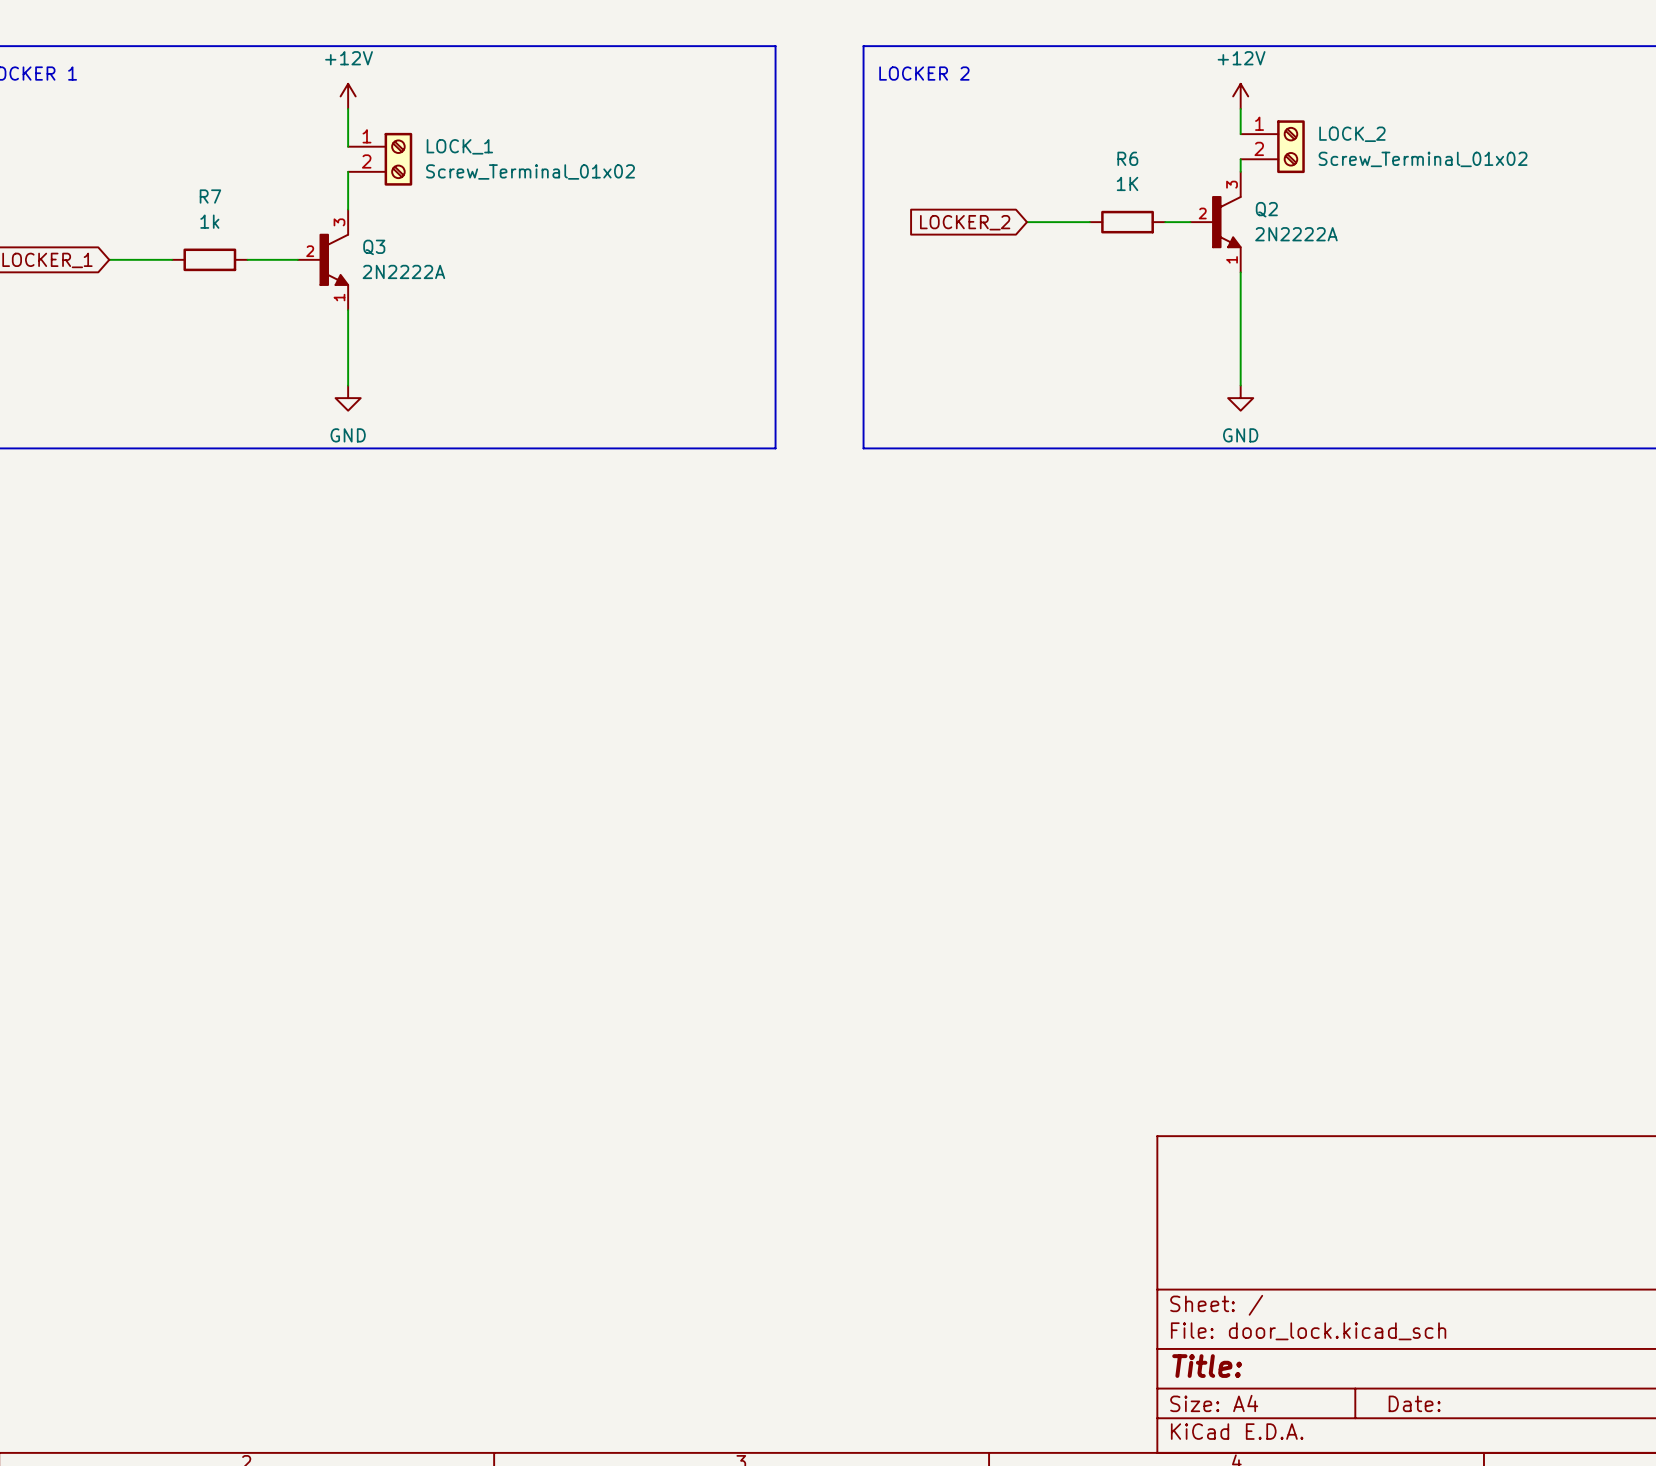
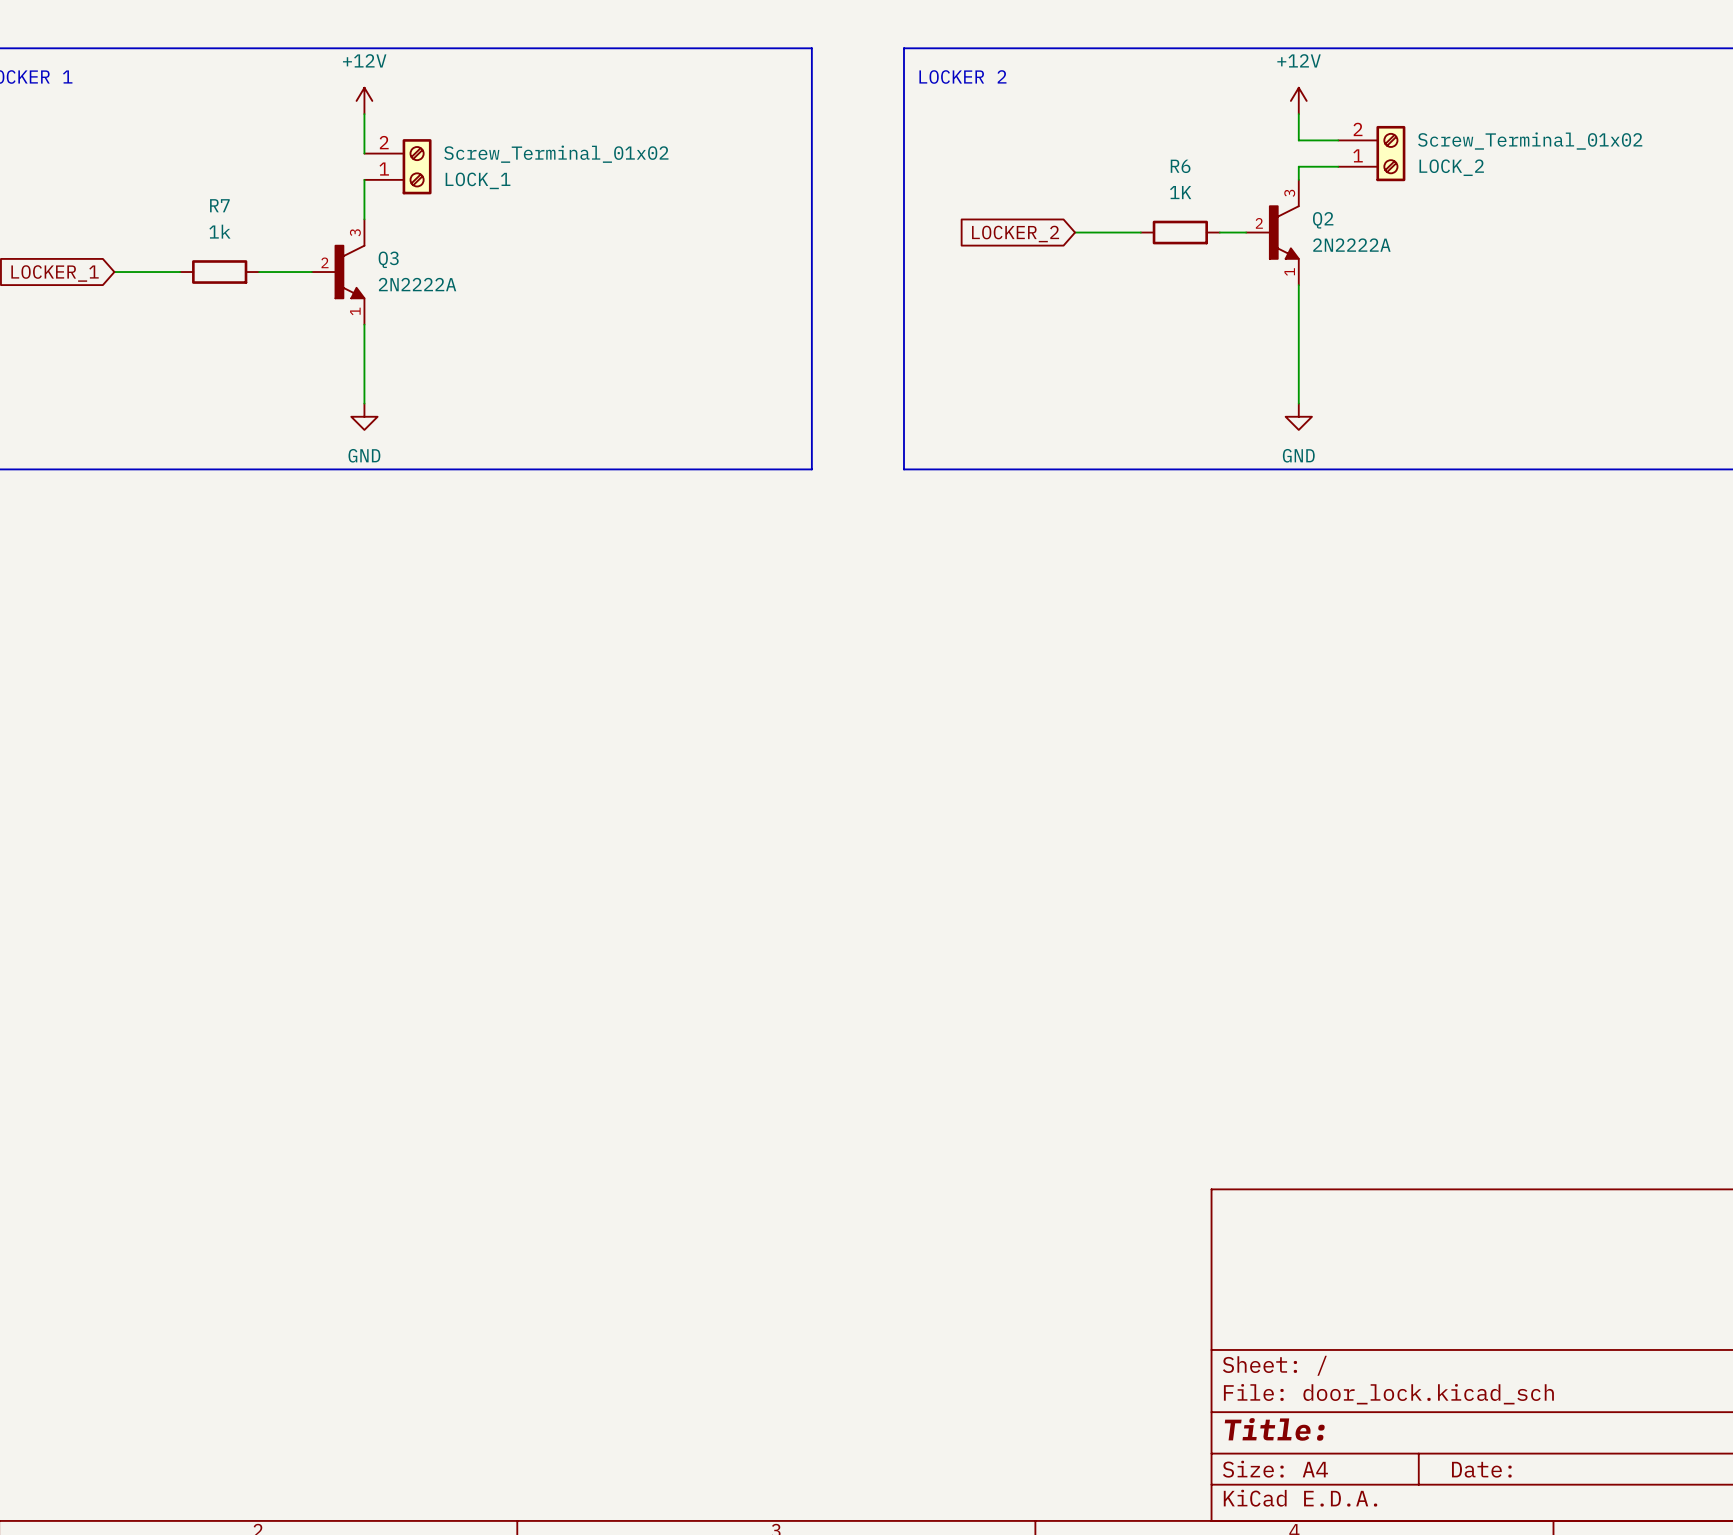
LOCK_2 flip: as is (1290, 146) -> up-down (1390, 153)
LOCK_1 flip: as is (398, 159) -> up-down (417, 166)

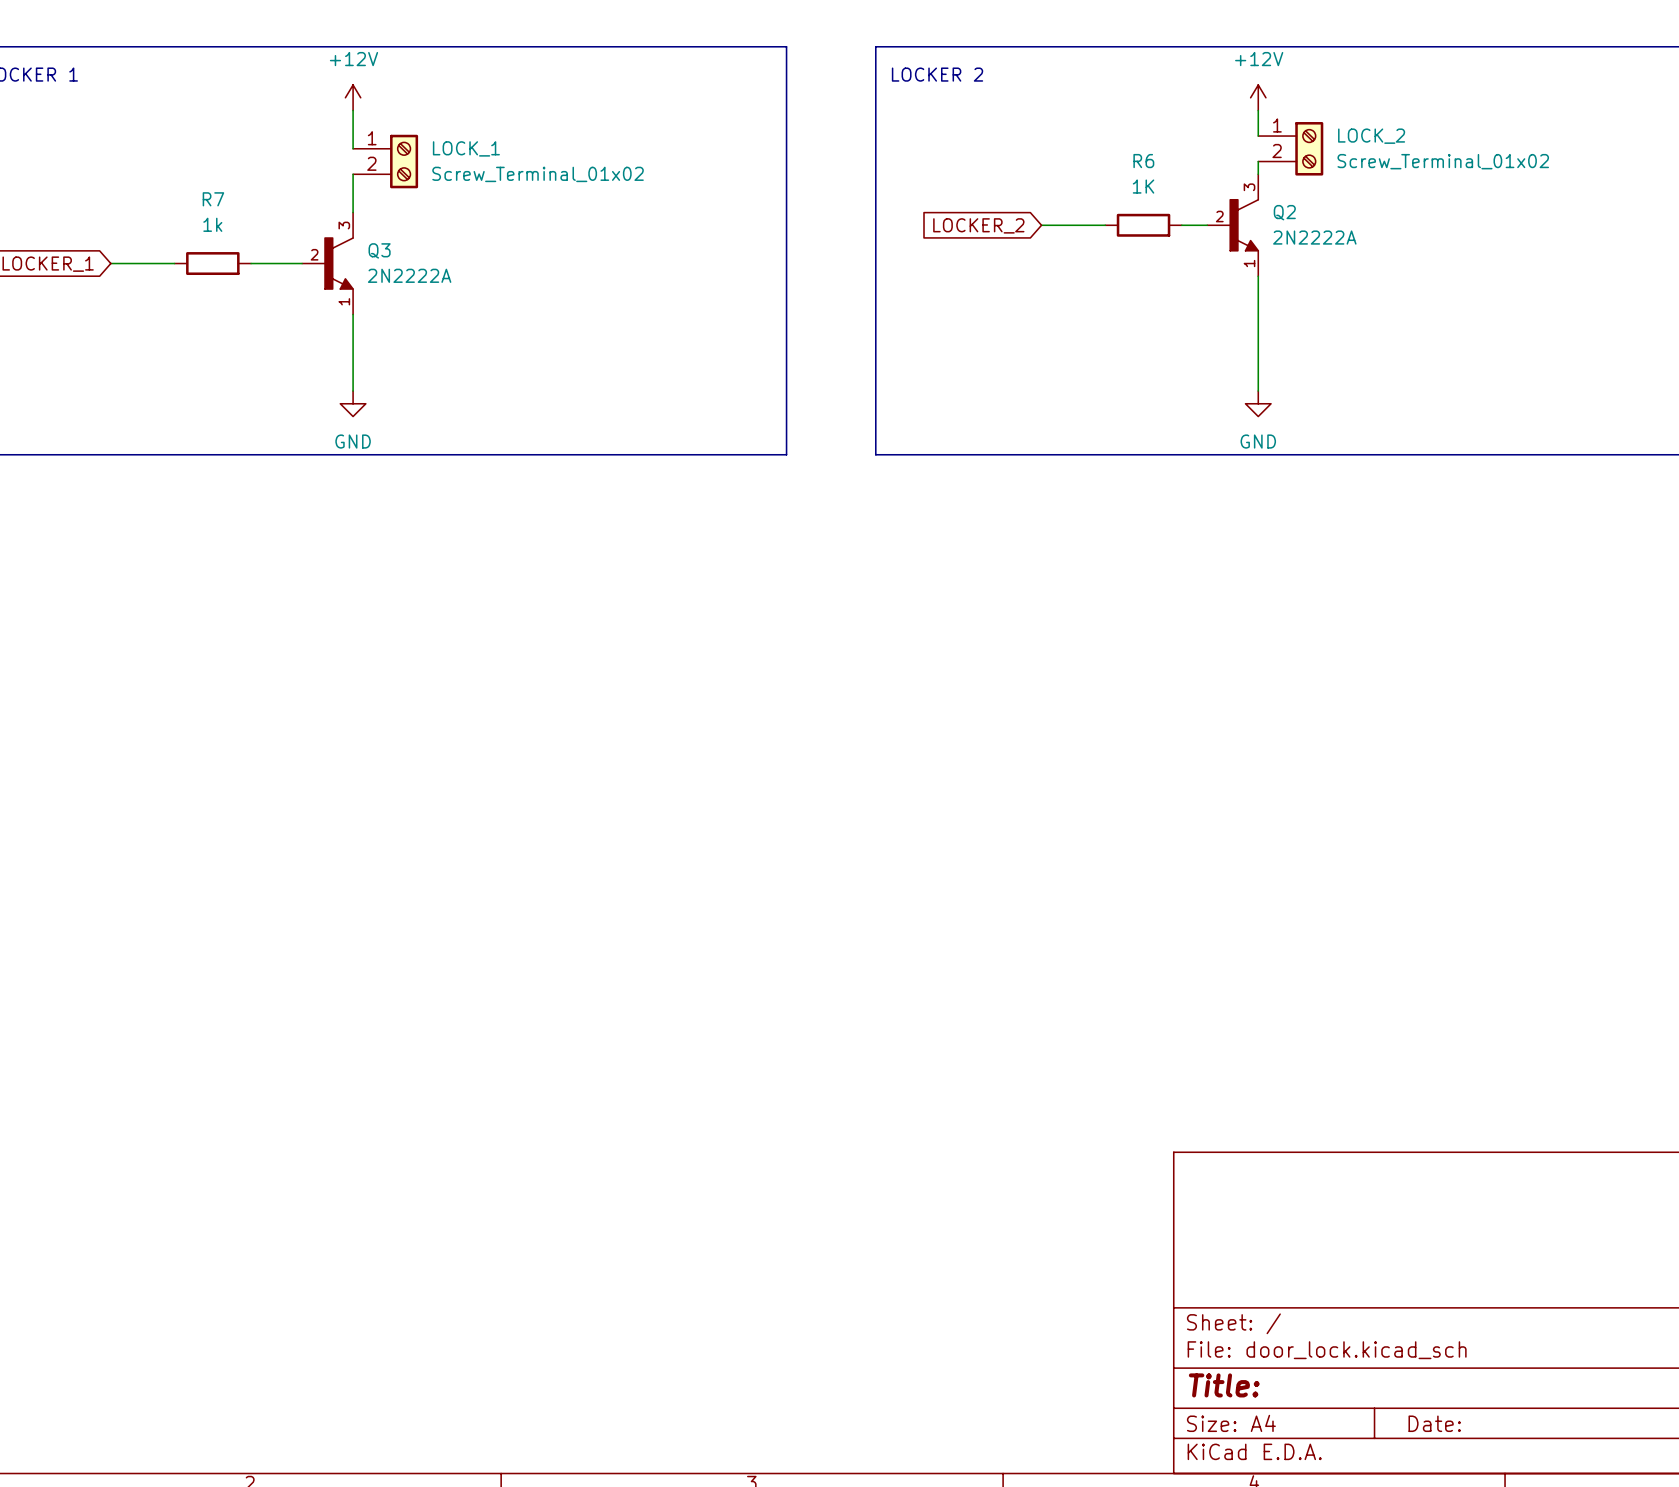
LOCK_2 flip: as is (1390, 153) -> up-down (1309, 148)
LOCK_1 flip: as is (417, 166) -> up-down (404, 161)

